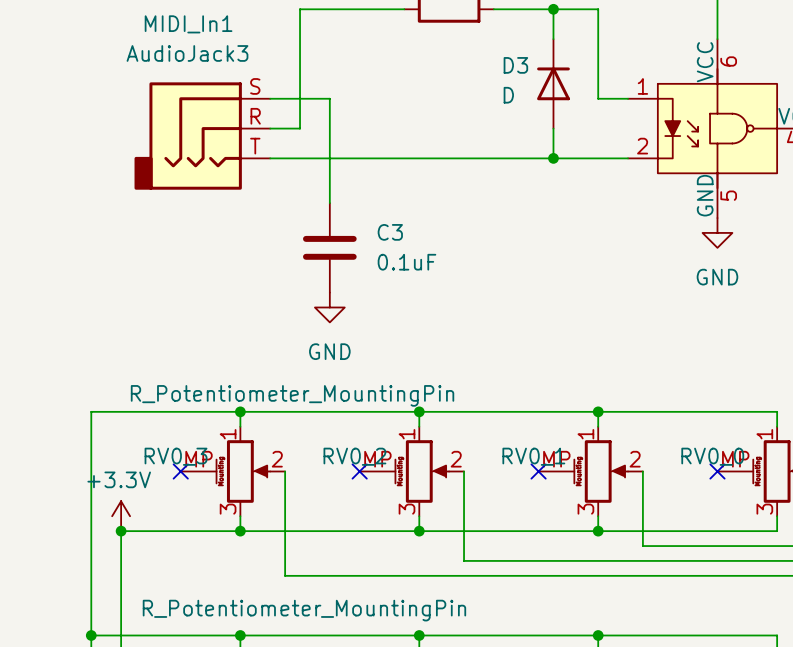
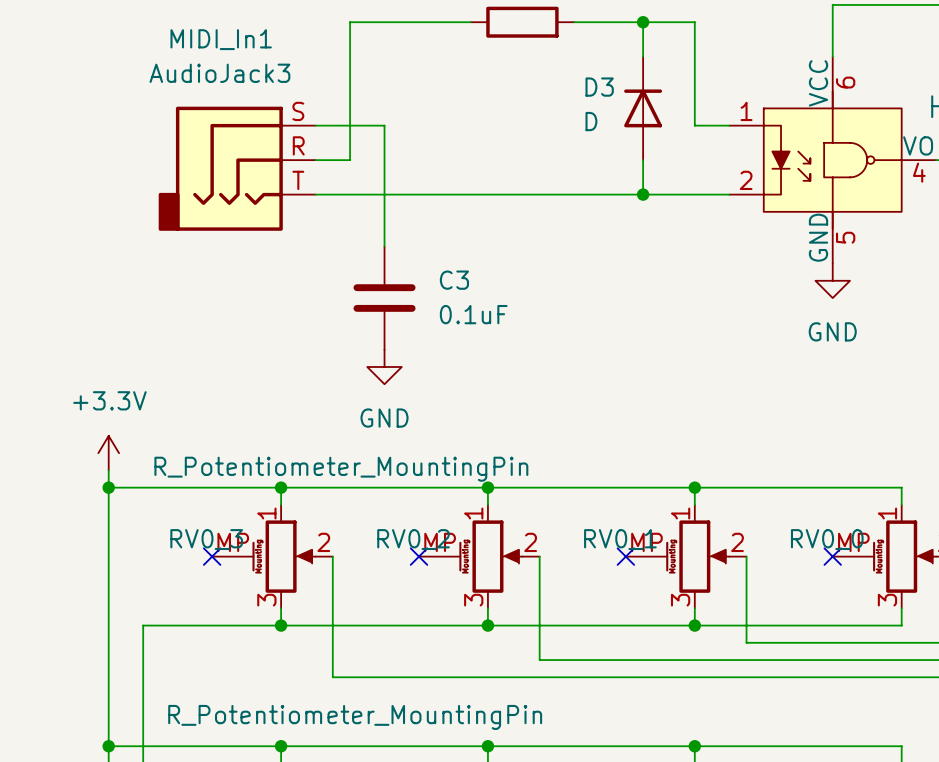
wire: none -> (108, 470) (108, 487)
junction: none -> (108, 487)
power symbol text position: +3.3V (119, 479) -> +3.3V (109, 400)
power symbol position: +3.3V (121, 516) -> +3.3V (108, 453)
junction: (121, 531) -> none

